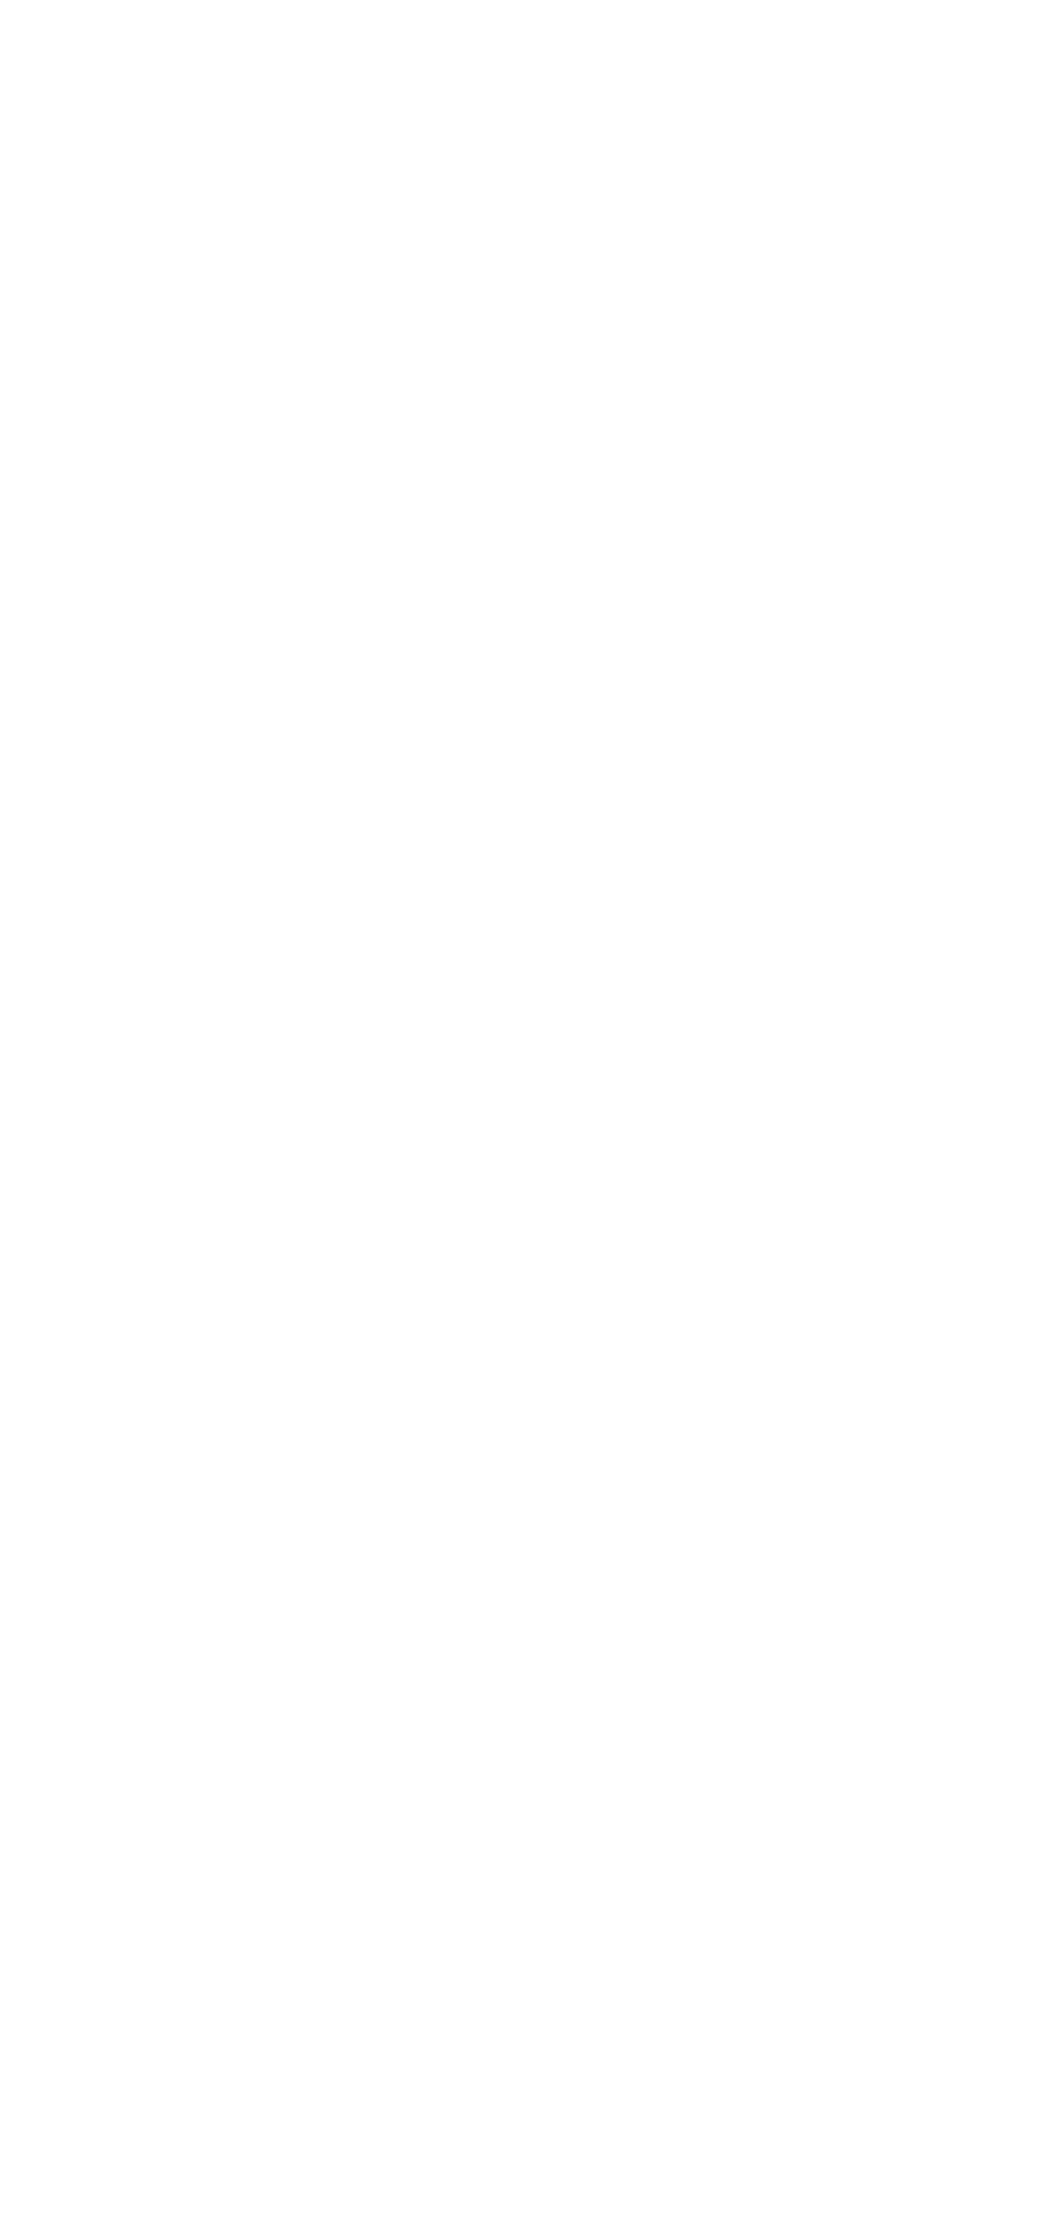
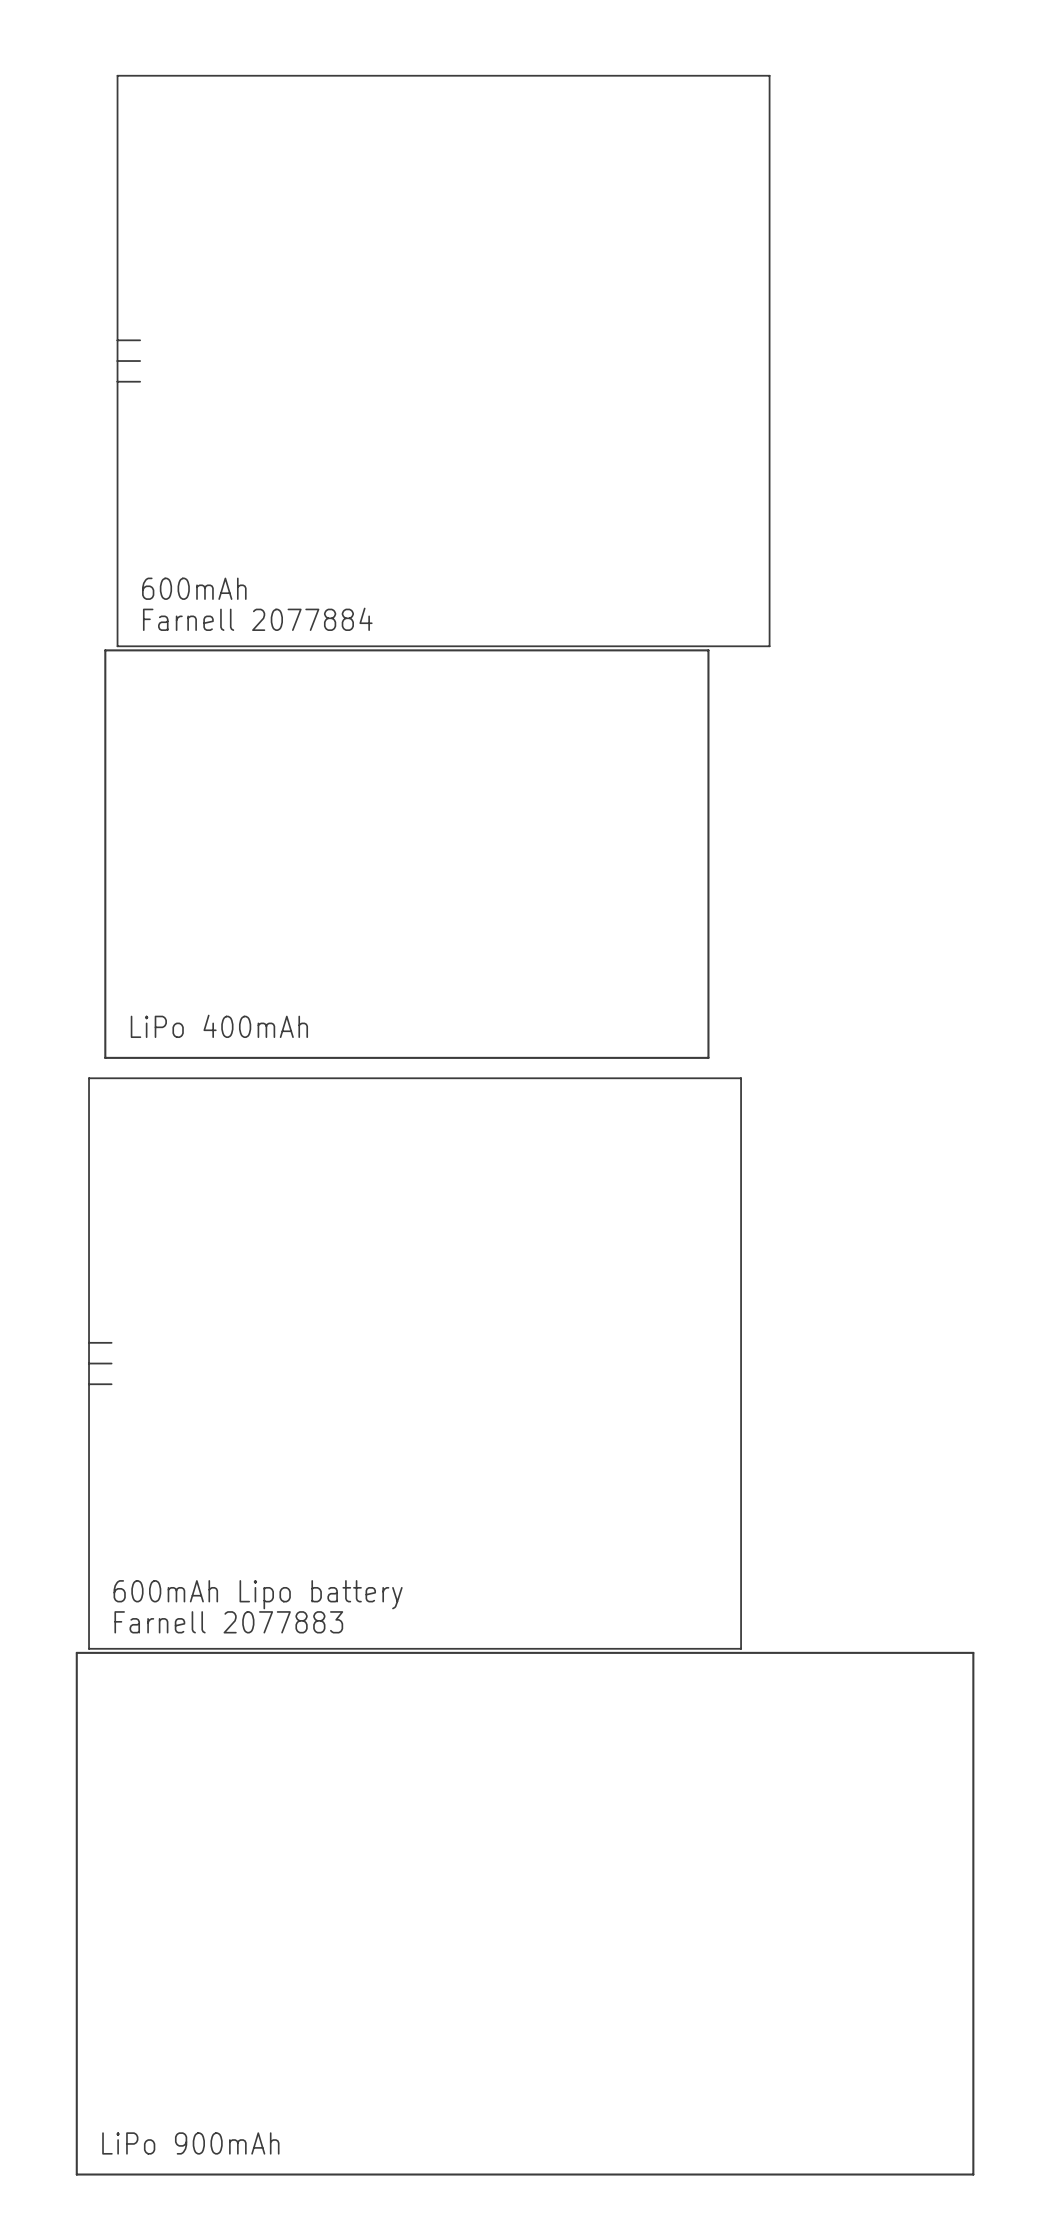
drawing: none -> [75, 75, 975, 2176]

